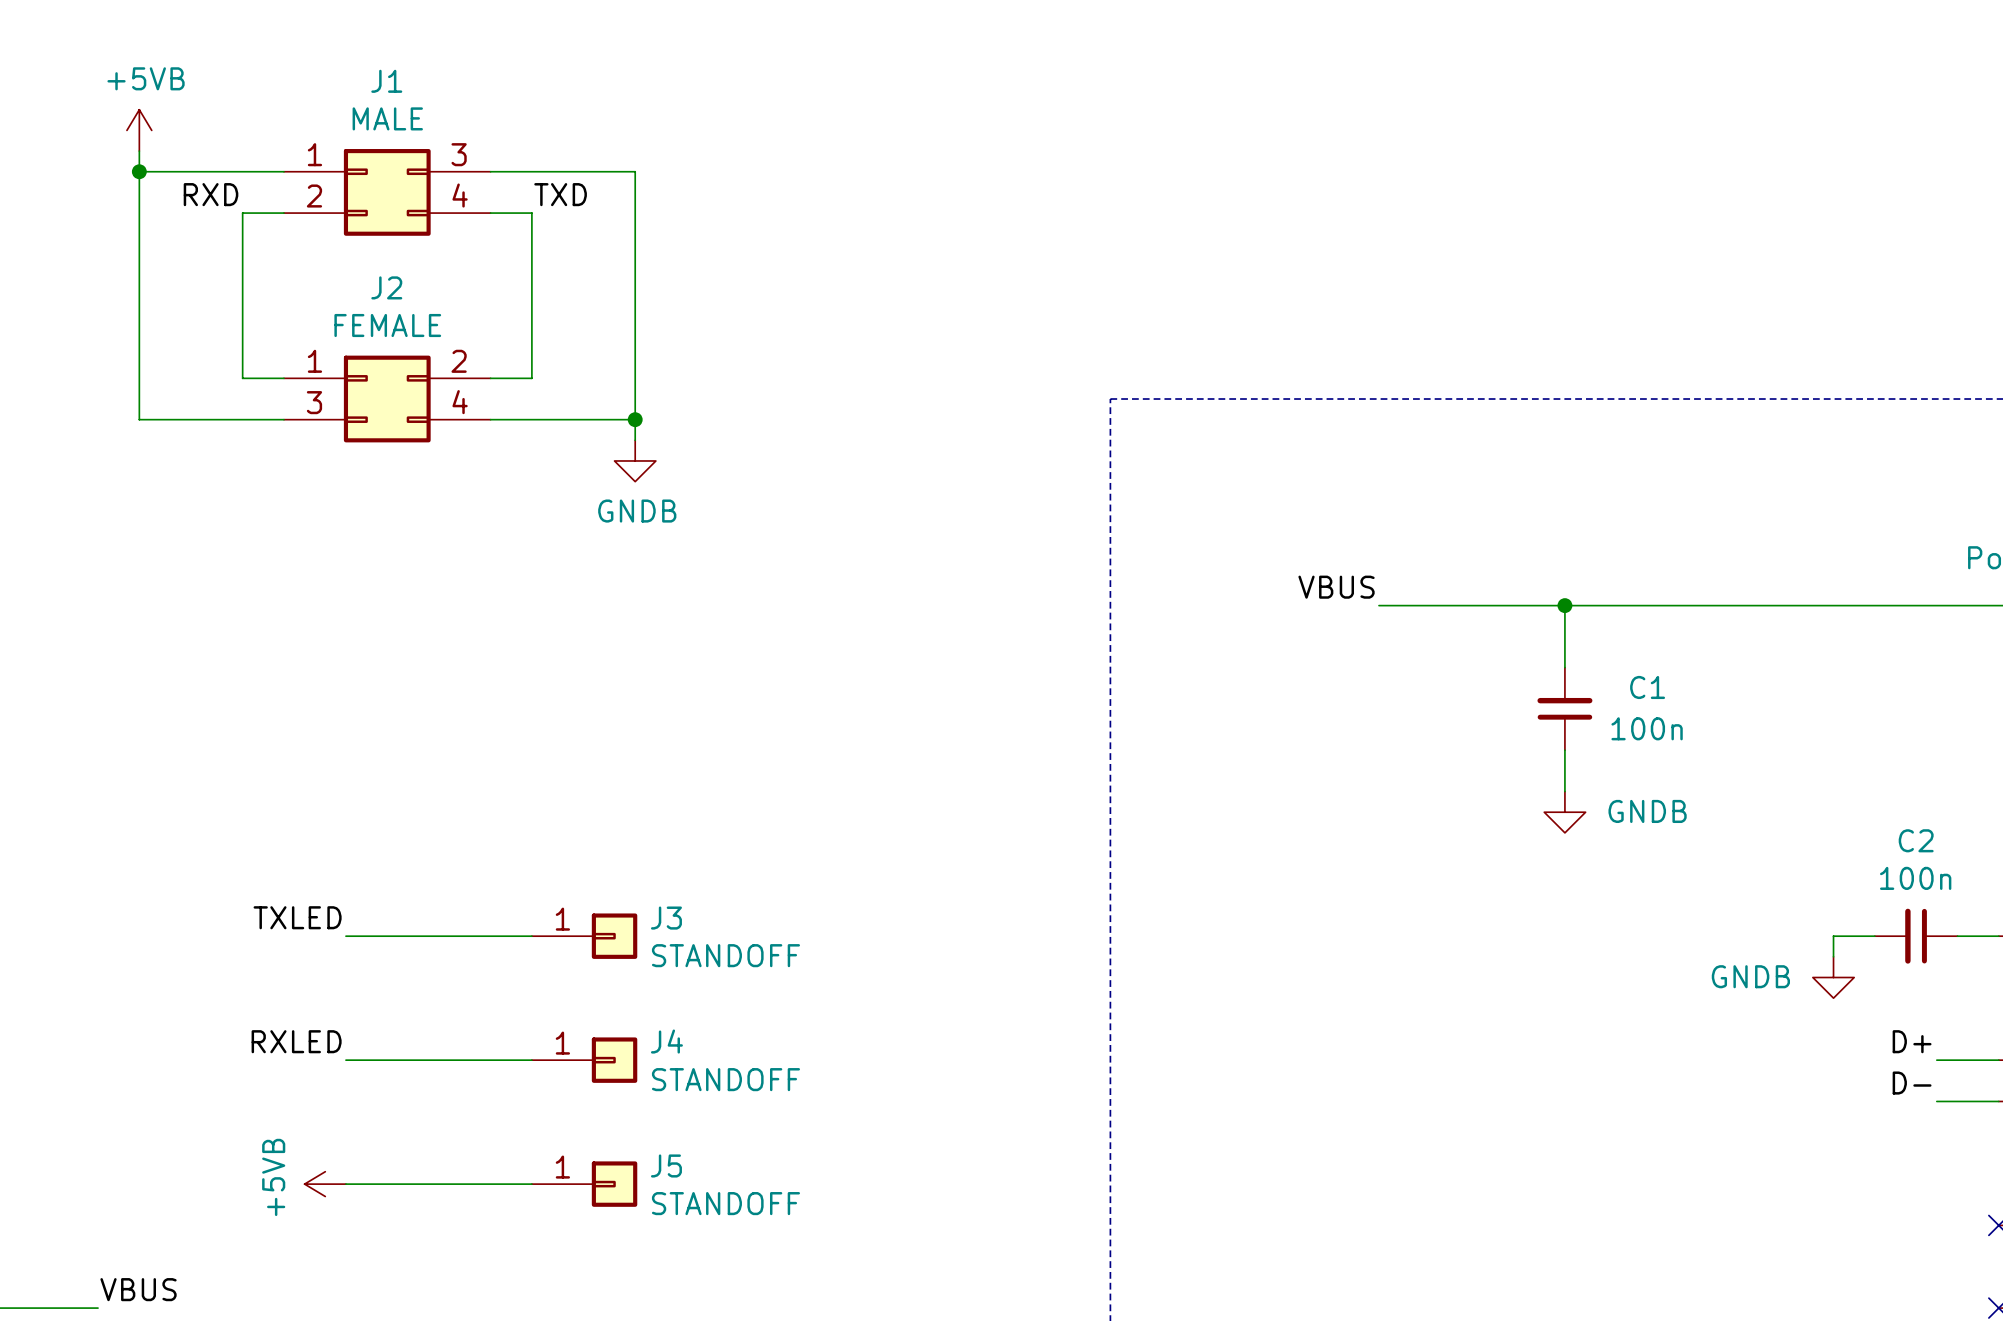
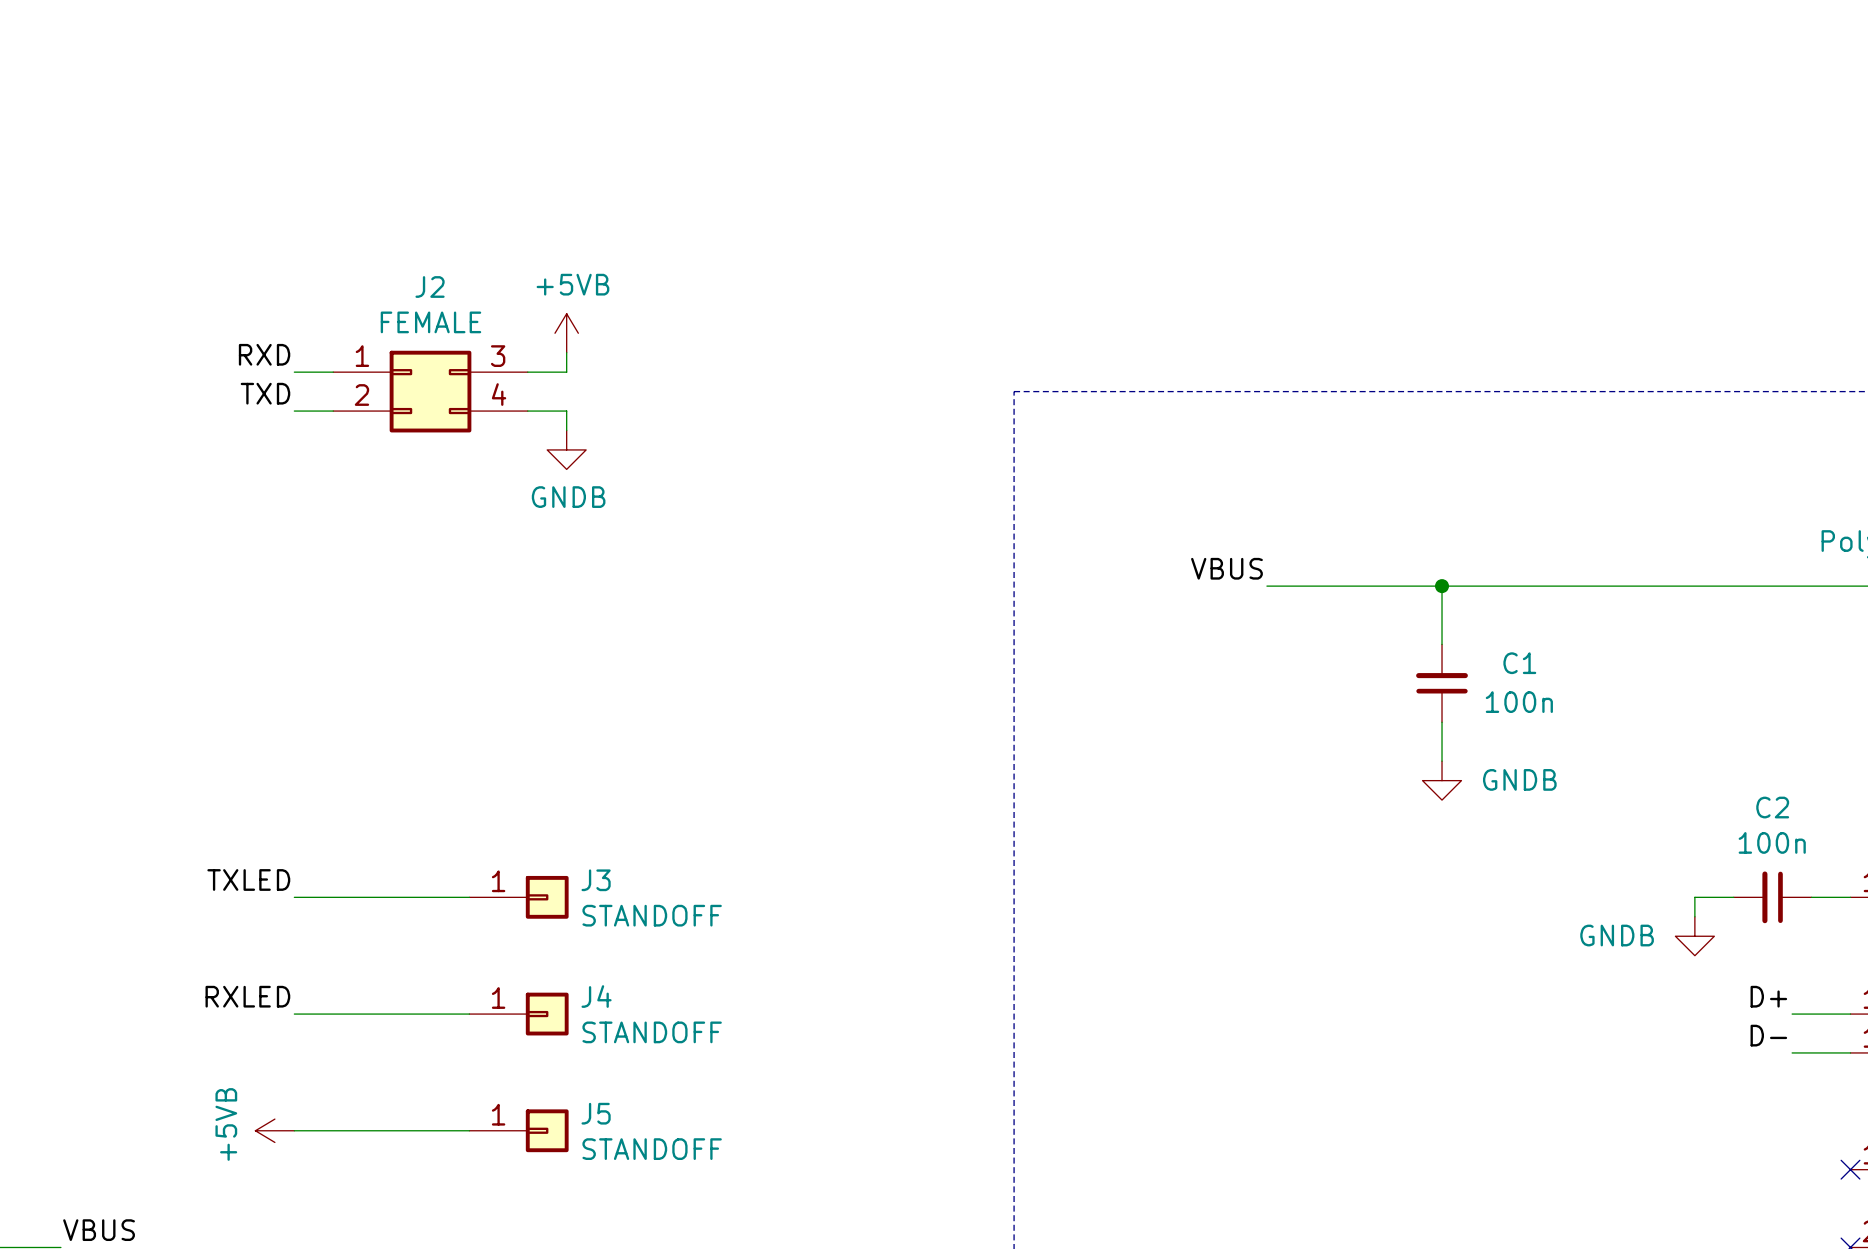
power symbol: +5VB (139, 130) -> none
wire: (139, 151) (139, 419) (283, 419) -> none
wire: (139, 171) (283, 171) -> none
junction: (139, 171) -> none
wire: (490, 171) (635, 171) (635, 357) -> none
J1: MALE (387, 192) -> none
label position: RXD (211, 194) -> RXD (264, 354)
label position: TXD (560, 194) -> TXD (265, 393)
wire: (283, 213) (242, 213) (242, 378) (283, 378) -> none
wire: (490, 213) (531, 213) (531, 378) (490, 378) -> none
power symbol: none -> +5VB (566, 333)
J2 pin number: 2 (459, 361) -> 3 (498, 356)
wire: (635, 378) (635, 419) -> (566, 372) (527, 372)
J2 position: (387, 399) -> (430, 391)
J2 pin number: 3 (314, 402) -> 2 (361, 395)
junction: (635, 419) -> none

